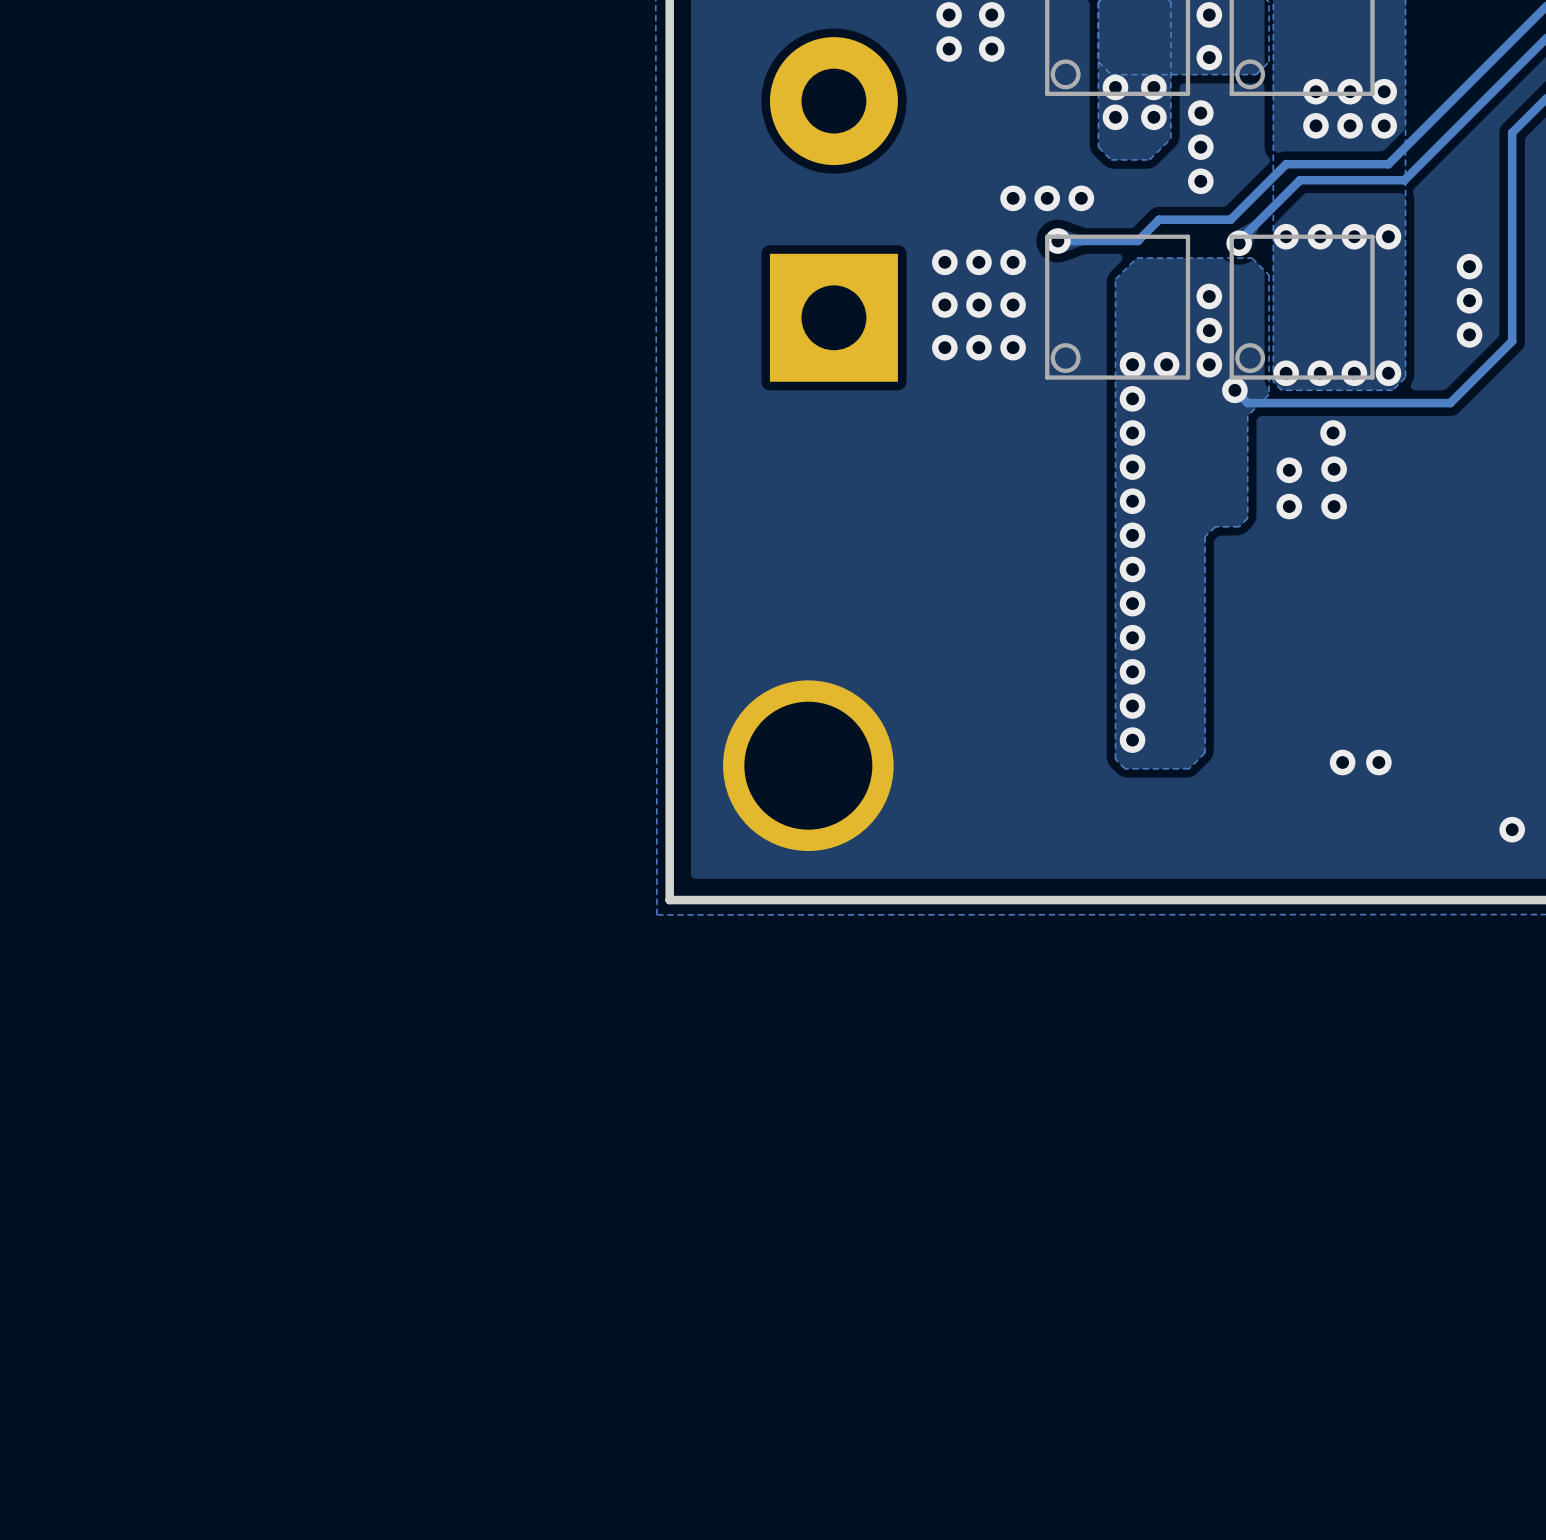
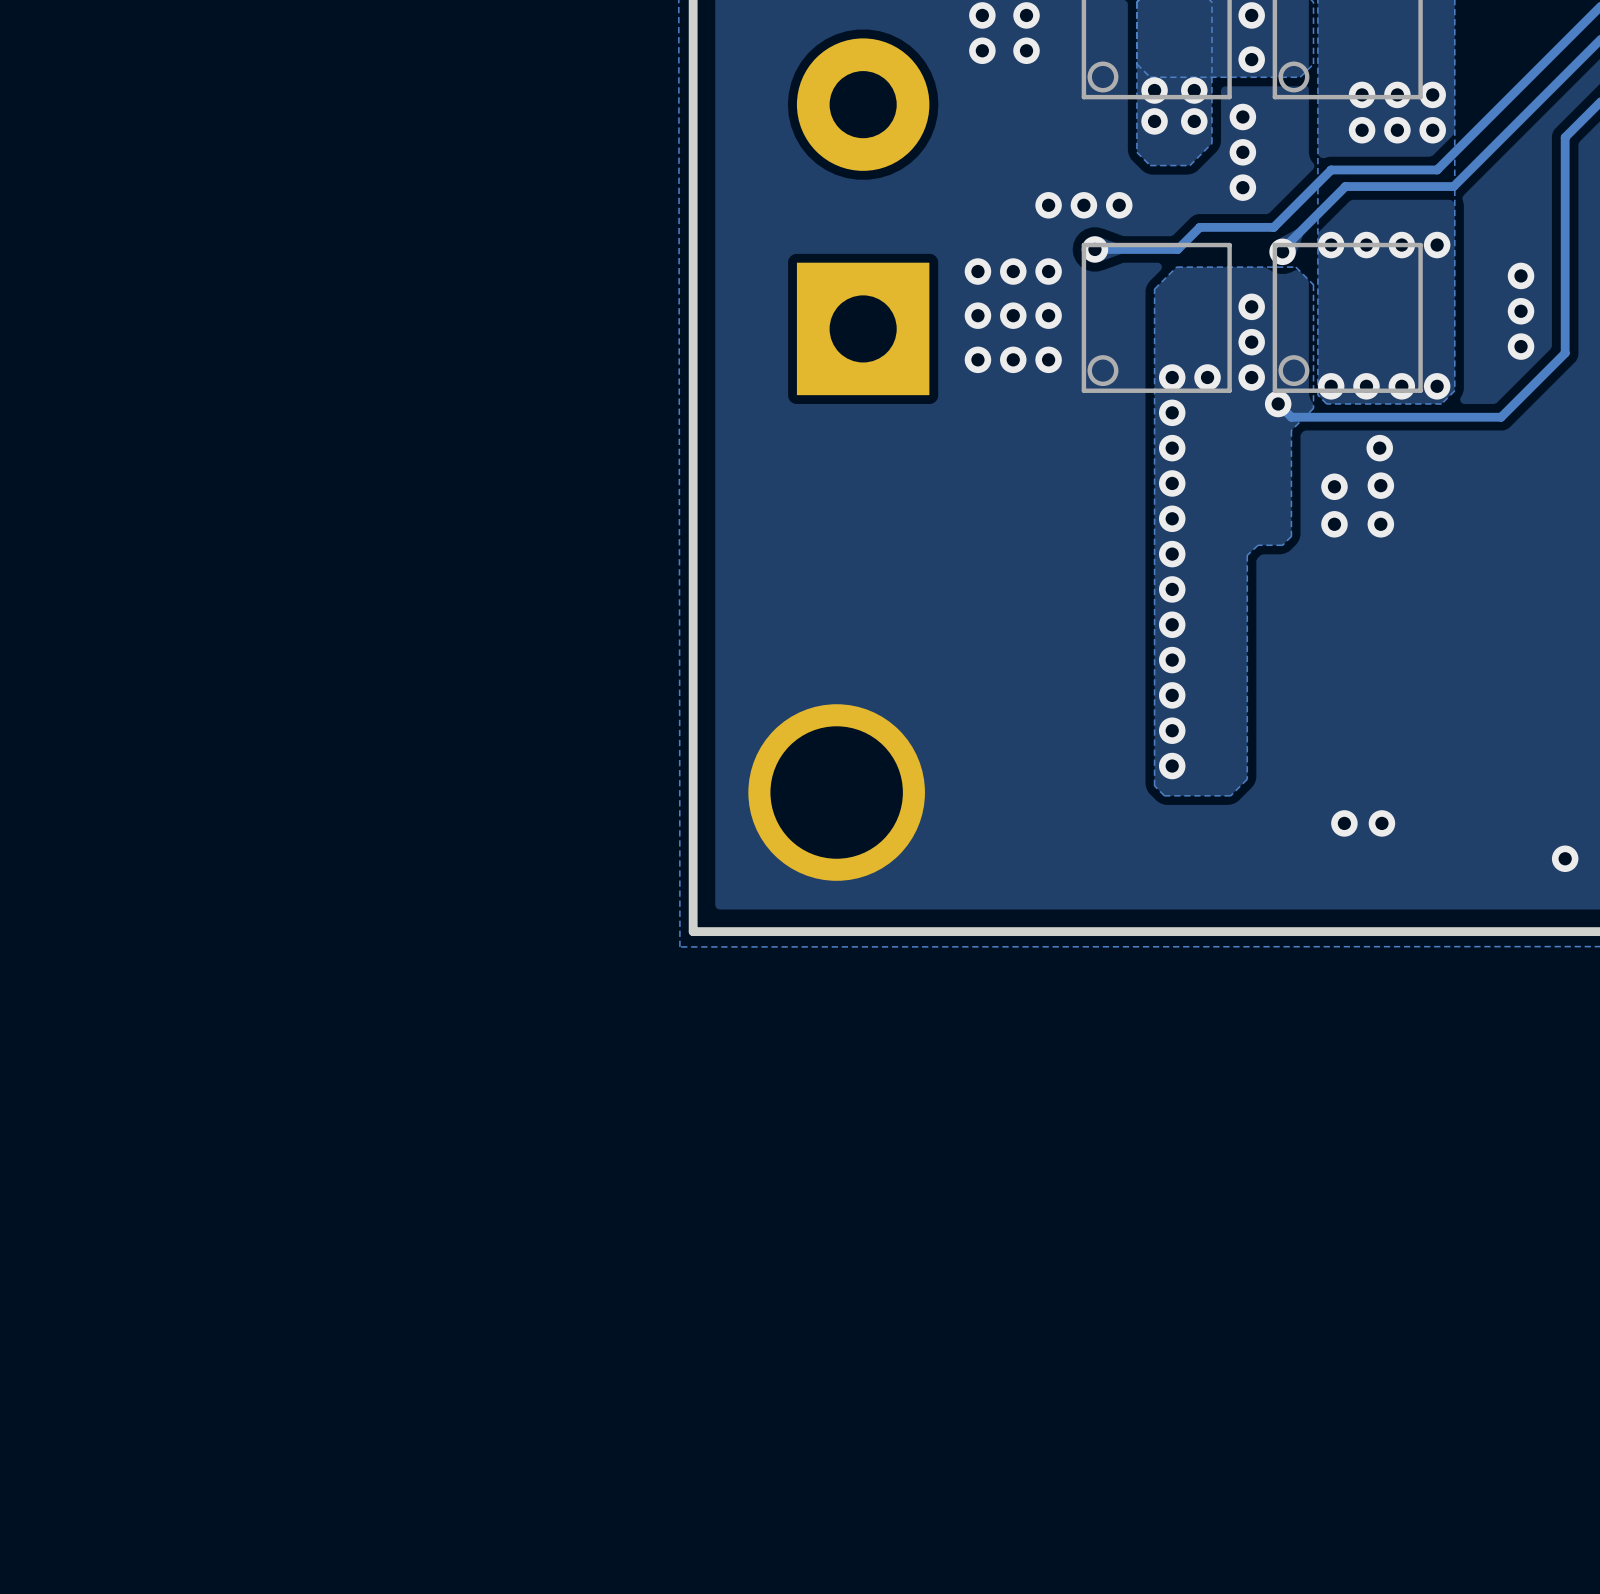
via: (1342, 762) -> none
via: (1378, 762) -> none
via: none -> (1344, 823)
via: none -> (1381, 823)

